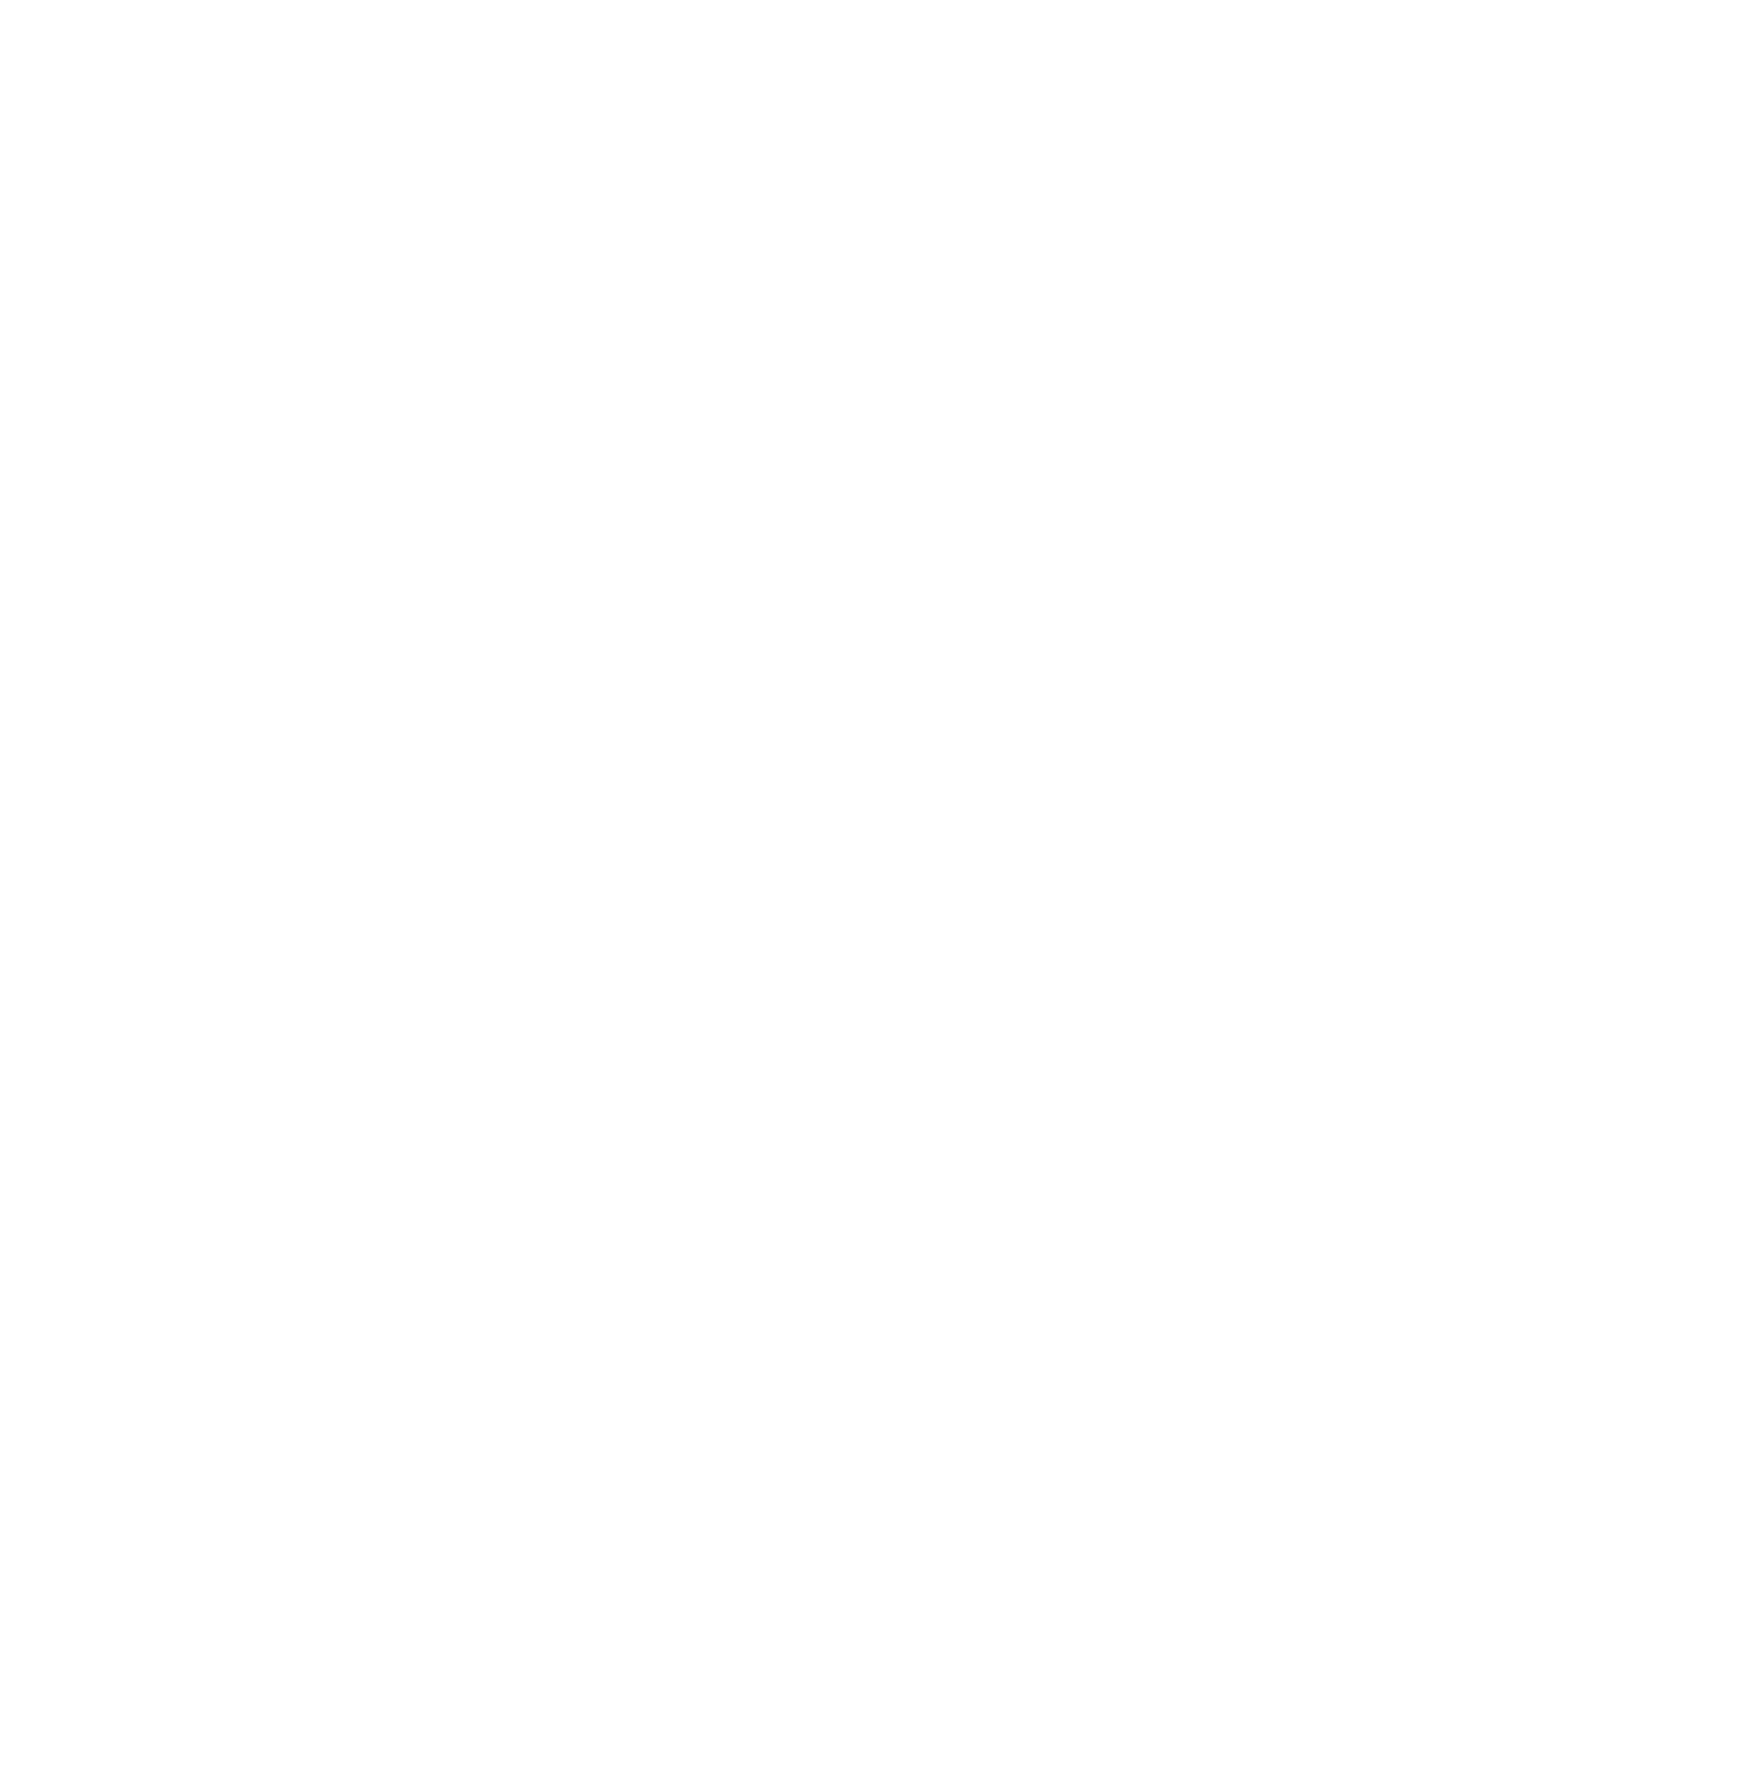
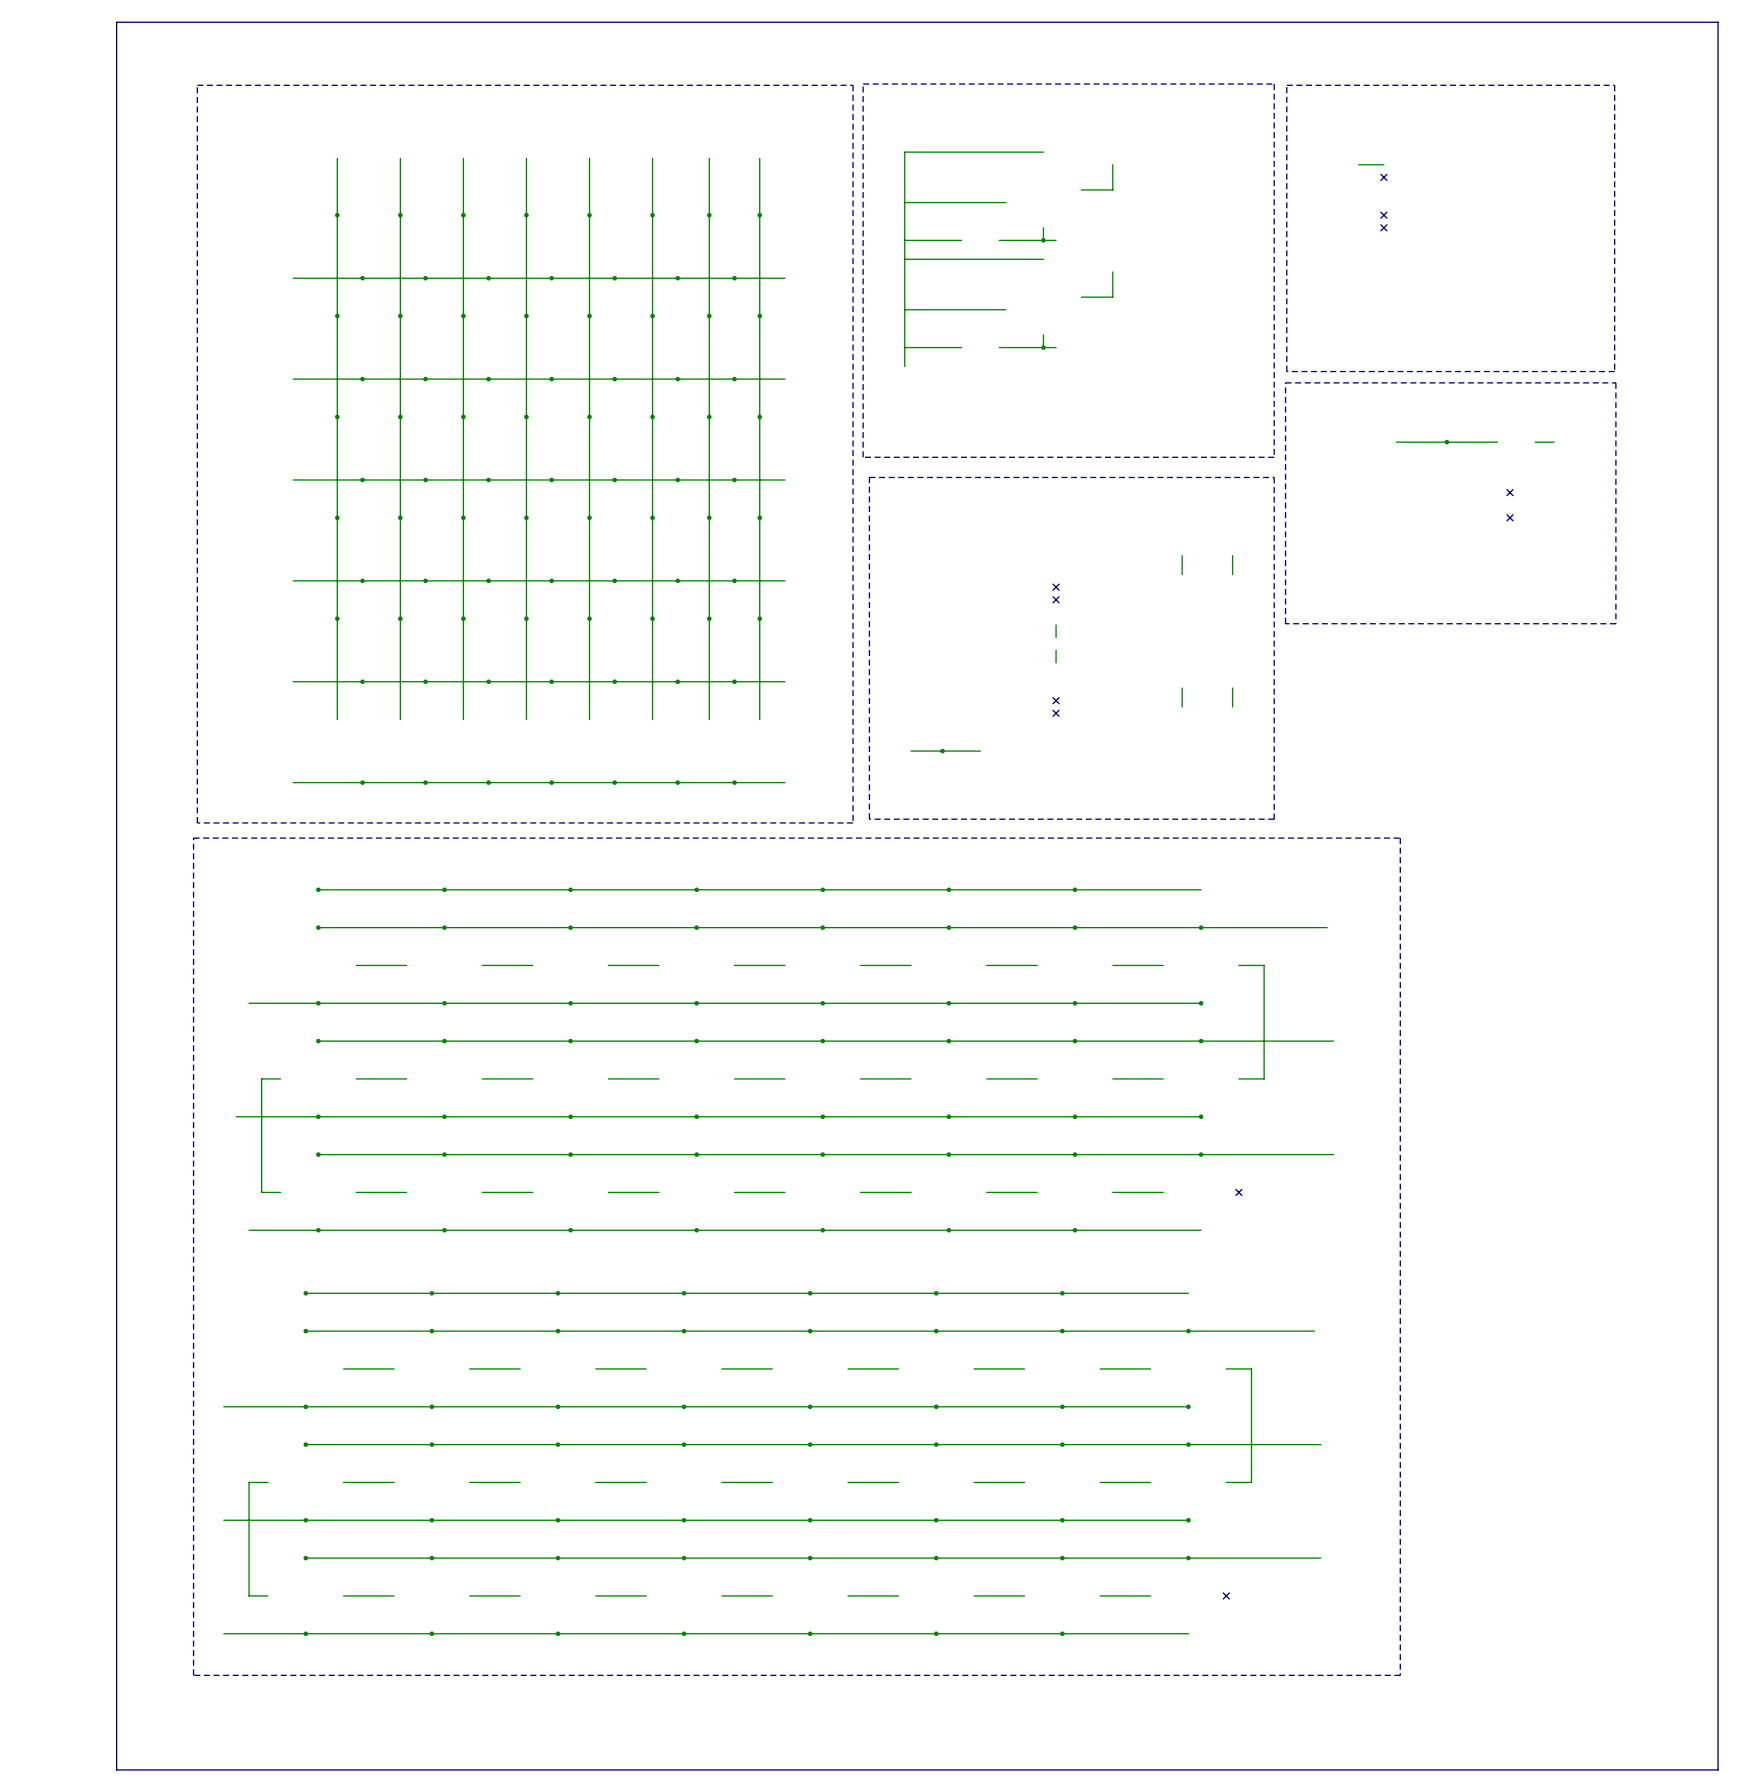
line: none -> (116, 22) (1718, 22) (1718, 1769) (116, 1769) (116, 22)
line: none -> (863, 84) (1274, 84) (1274, 457) (863, 457) (863, 84)
line: none -> (197, 85) (853, 85) (853, 822) (197, 822) (197, 85)
line: none -> (1286, 85) (1614, 85) (1614, 371) (1286, 371) (1286, 85)
wire: none -> (1043, 152) (904, 152) (904, 366)
wire: none -> (337, 158) (337, 719)
wire: none -> (400, 158) (400, 719)
wire: none -> (463, 158) (463, 719)
wire: none -> (526, 158) (526, 719)
wire: none -> (589, 158) (589, 719)
wire: none -> (652, 158) (652, 719)
wire: none -> (709, 158) (709, 719)
wire: none -> (759, 158) (759, 719)
wire: none -> (1112, 164) (1112, 189) (1081, 189)
wire: none -> (1358, 164) (1383, 164)
no-connect mark: none -> (1383, 177)
wire: none -> (904, 202) (1005, 202)
junction: none -> (337, 215)
junction: none -> (400, 215)
junction: none -> (463, 215)
junction: none -> (526, 215)
junction: none -> (589, 215)
junction: none -> (652, 215)
junction: none -> (709, 215)
junction: none -> (759, 215)
no-connect mark: none -> (1383, 215)
wire: none -> (1043, 227) (1043, 240)
no-connect mark: none -> (1383, 227)
wire: none -> (904, 240) (961, 240)
wire: none -> (999, 240) (1056, 240)
junction: none -> (1043, 240)
wire: none -> (904, 259) (1043, 259)
wire: none -> (1112, 271) (1112, 297) (1081, 297)
wire: none -> (293, 278) (784, 278)
junction: none -> (362, 278)
junction: none -> (425, 278)
junction: none -> (488, 278)
junction: none -> (551, 278)
junction: none -> (614, 278)
junction: none -> (677, 278)
junction: none -> (734, 278)
wire: none -> (904, 309) (1005, 309)
junction: none -> (337, 316)
junction: none -> (400, 316)
junction: none -> (463, 316)
junction: none -> (526, 316)
junction: none -> (589, 316)
junction: none -> (652, 316)
junction: none -> (709, 316)
junction: none -> (759, 316)
wire: none -> (1043, 334) (1043, 347)
wire: none -> (904, 347) (961, 347)
wire: none -> (999, 347) (1056, 347)
junction: none -> (1043, 347)
wire: none -> (293, 379) (784, 379)
junction: none -> (362, 379)
junction: none -> (425, 379)
junction: none -> (488, 379)
junction: none -> (551, 379)
junction: none -> (614, 379)
junction: none -> (677, 379)
junction: none -> (734, 379)
line: none -> (1285, 382) (1615, 382) (1615, 623) (1285, 623) (1285, 382)
junction: none -> (337, 416)
junction: none -> (400, 416)
junction: none -> (463, 416)
junction: none -> (526, 416)
junction: none -> (589, 416)
junction: none -> (652, 416)
junction: none -> (709, 416)
junction: none -> (759, 416)
wire: none -> (1396, 442) (1497, 442)
junction: none -> (1446, 442)
wire: none -> (1535, 442) (1554, 442)
line: none -> (869, 477) (1274, 477) (1274, 819) (869, 819) (869, 477)
wire: none -> (293, 479) (784, 479)
junction: none -> (362, 479)
junction: none -> (425, 479)
junction: none -> (488, 479)
junction: none -> (551, 479)
junction: none -> (614, 479)
junction: none -> (677, 479)
junction: none -> (734, 479)
no-connect mark: none -> (1509, 492)
junction: none -> (337, 517)
junction: none -> (400, 517)
junction: none -> (463, 517)
junction: none -> (526, 517)
junction: none -> (589, 517)
junction: none -> (652, 517)
junction: none -> (709, 517)
junction: none -> (759, 517)
no-connect mark: none -> (1509, 517)
wire: none -> (1182, 555) (1182, 574)
wire: none -> (1232, 555) (1232, 574)
wire: none -> (293, 580) (784, 580)
junction: none -> (362, 580)
junction: none -> (425, 580)
junction: none -> (488, 580)
junction: none -> (551, 580)
junction: none -> (614, 580)
junction: none -> (677, 580)
junction: none -> (734, 580)
no-connect mark: none -> (1056, 587)
no-connect mark: none -> (1056, 599)
junction: none -> (337, 618)
junction: none -> (400, 618)
junction: none -> (463, 618)
junction: none -> (526, 618)
junction: none -> (589, 618)
junction: none -> (652, 618)
junction: none -> (709, 618)
junction: none -> (759, 618)
wire: none -> (1056, 624) (1056, 637)
wire: none -> (1056, 650) (1056, 662)
wire: none -> (293, 681) (784, 681)
junction: none -> (362, 681)
junction: none -> (425, 681)
junction: none -> (488, 681)
junction: none -> (551, 681)
junction: none -> (614, 681)
junction: none -> (677, 681)
junction: none -> (734, 681)
wire: none -> (1182, 688) (1182, 706)
wire: none -> (1232, 688) (1232, 706)
no-connect mark: none -> (1056, 700)
no-connect mark: none -> (1056, 713)
wire: none -> (911, 751) (980, 751)
junction: none -> (942, 751)
wire: none -> (293, 782) (784, 782)
junction: none -> (362, 782)
junction: none -> (425, 782)
junction: none -> (488, 782)
junction: none -> (551, 782)
junction: none -> (614, 782)
junction: none -> (677, 782)
junction: none -> (734, 782)
line: none -> (193, 838) (1400, 838) (1400, 1675) (193, 1675) (193, 838)
wire: none -> (318, 889) (1201, 889)
junction: none -> (318, 889)
junction: none -> (444, 889)
junction: none -> (570, 889)
junction: none -> (696, 889)
junction: none -> (822, 889)
junction: none -> (948, 889)
junction: none -> (1074, 889)
wire: none -> (318, 927) (1327, 927)
junction: none -> (318, 927)
junction: none -> (444, 927)
junction: none -> (570, 927)
junction: none -> (696, 927)
junction: none -> (822, 927)
junction: none -> (948, 927)
junction: none -> (1074, 927)
junction: none -> (1201, 927)
wire: none -> (356, 965) (406, 965)
wire: none -> (482, 965) (532, 965)
wire: none -> (608, 965) (658, 965)
wire: none -> (734, 965) (784, 965)
wire: none -> (860, 965) (911, 965)
wire: none -> (986, 965) (1037, 965)
wire: none -> (1112, 965) (1163, 965)
wire: none -> (1238, 965) (1264, 965) (1264, 1078) (1238, 1078)
wire: none -> (249, 1003) (1201, 1003)
junction: none -> (318, 1003)
junction: none -> (444, 1003)
junction: none -> (570, 1003)
junction: none -> (696, 1003)
junction: none -> (822, 1003)
junction: none -> (948, 1003)
junction: none -> (1074, 1003)
junction: none -> (1201, 1003)
wire: none -> (318, 1041) (1333, 1041)
junction: none -> (318, 1041)
junction: none -> (444, 1041)
junction: none -> (570, 1041)
junction: none -> (696, 1041)
junction: none -> (822, 1041)
junction: none -> (948, 1041)
junction: none -> (1074, 1041)
junction: none -> (1201, 1041)
wire: none -> (280, 1078) (261, 1078) (261, 1192) (280, 1192)
wire: none -> (356, 1078) (406, 1078)
wire: none -> (482, 1078) (532, 1078)
wire: none -> (608, 1078) (658, 1078)
wire: none -> (734, 1078) (784, 1078)
wire: none -> (860, 1078) (911, 1078)
wire: none -> (986, 1078) (1037, 1078)
wire: none -> (1112, 1078) (1163, 1078)
wire: none -> (236, 1116) (1201, 1116)
junction: none -> (318, 1116)
junction: none -> (444, 1116)
junction: none -> (570, 1116)
junction: none -> (696, 1116)
junction: none -> (822, 1116)
junction: none -> (948, 1116)
junction: none -> (1074, 1116)
junction: none -> (1201, 1116)
wire: none -> (318, 1154) (1333, 1154)
junction: none -> (318, 1154)
junction: none -> (444, 1154)
junction: none -> (570, 1154)
junction: none -> (696, 1154)
junction: none -> (822, 1154)
junction: none -> (948, 1154)
junction: none -> (1074, 1154)
junction: none -> (1201, 1154)
wire: none -> (356, 1192) (406, 1192)
wire: none -> (482, 1192) (532, 1192)
wire: none -> (608, 1192) (658, 1192)
wire: none -> (734, 1192) (784, 1192)
wire: none -> (860, 1192) (911, 1192)
wire: none -> (986, 1192) (1037, 1192)
wire: none -> (1112, 1192) (1163, 1192)
no-connect mark: none -> (1238, 1192)
wire: none -> (249, 1230) (1201, 1230)
junction: none -> (318, 1230)
junction: none -> (444, 1230)
junction: none -> (570, 1230)
junction: none -> (696, 1230)
junction: none -> (822, 1230)
junction: none -> (948, 1230)
junction: none -> (1074, 1230)
wire: none -> (305, 1293) (1188, 1293)
junction: none -> (305, 1293)
junction: none -> (431, 1293)
junction: none -> (557, 1293)
junction: none -> (684, 1293)
junction: none -> (810, 1293)
junction: none -> (936, 1293)
junction: none -> (1062, 1293)
wire: none -> (305, 1331) (1314, 1331)
junction: none -> (305, 1331)
junction: none -> (431, 1331)
junction: none -> (557, 1331)
junction: none -> (684, 1331)
junction: none -> (810, 1331)
junction: none -> (936, 1331)
junction: none -> (1062, 1331)
junction: none -> (1188, 1331)
wire: none -> (343, 1368) (394, 1368)
wire: none -> (469, 1368) (520, 1368)
wire: none -> (595, 1368) (646, 1368)
wire: none -> (721, 1368) (772, 1368)
wire: none -> (847, 1368) (898, 1368)
wire: none -> (974, 1368) (1024, 1368)
wire: none -> (1100, 1368) (1150, 1368)
wire: none -> (1226, 1368) (1251, 1368) (1251, 1482) (1226, 1482)
wire: none -> (223, 1406) (1188, 1406)
junction: none -> (305, 1406)
junction: none -> (431, 1406)
junction: none -> (557, 1406)
junction: none -> (684, 1406)
junction: none -> (810, 1406)
junction: none -> (936, 1406)
junction: none -> (1062, 1406)
junction: none -> (1188, 1406)
wire: none -> (305, 1444) (1320, 1444)
junction: none -> (305, 1444)
junction: none -> (431, 1444)
junction: none -> (557, 1444)
junction: none -> (684, 1444)
junction: none -> (810, 1444)
junction: none -> (936, 1444)
junction: none -> (1062, 1444)
junction: none -> (1188, 1444)
wire: none -> (267, 1482) (249, 1482) (249, 1595) (267, 1595)
wire: none -> (343, 1482) (394, 1482)
wire: none -> (469, 1482) (520, 1482)
wire: none -> (595, 1482) (646, 1482)
wire: none -> (721, 1482) (772, 1482)
wire: none -> (847, 1482) (898, 1482)
wire: none -> (974, 1482) (1024, 1482)
wire: none -> (1100, 1482) (1150, 1482)
wire: none -> (223, 1520) (1188, 1520)
junction: none -> (305, 1520)
junction: none -> (431, 1520)
junction: none -> (557, 1520)
junction: none -> (684, 1520)
junction: none -> (810, 1520)
junction: none -> (936, 1520)
junction: none -> (1062, 1520)
junction: none -> (1188, 1520)
wire: none -> (305, 1558) (1320, 1558)
junction: none -> (305, 1558)
junction: none -> (431, 1558)
junction: none -> (557, 1558)
junction: none -> (684, 1558)
junction: none -> (810, 1558)
junction: none -> (936, 1558)
junction: none -> (1062, 1558)
junction: none -> (1188, 1558)
wire: none -> (343, 1595) (394, 1595)
wire: none -> (469, 1595) (520, 1595)
wire: none -> (595, 1595) (646, 1595)
wire: none -> (721, 1595) (772, 1595)
wire: none -> (847, 1595) (898, 1595)
wire: none -> (974, 1595) (1024, 1595)
wire: none -> (1100, 1595) (1150, 1595)
no-connect mark: none -> (1226, 1595)
wire: none -> (223, 1633) (1188, 1633)
junction: none -> (305, 1633)
junction: none -> (431, 1633)
junction: none -> (557, 1633)
junction: none -> (684, 1633)
junction: none -> (810, 1633)
junction: none -> (936, 1633)
junction: none -> (1062, 1633)

